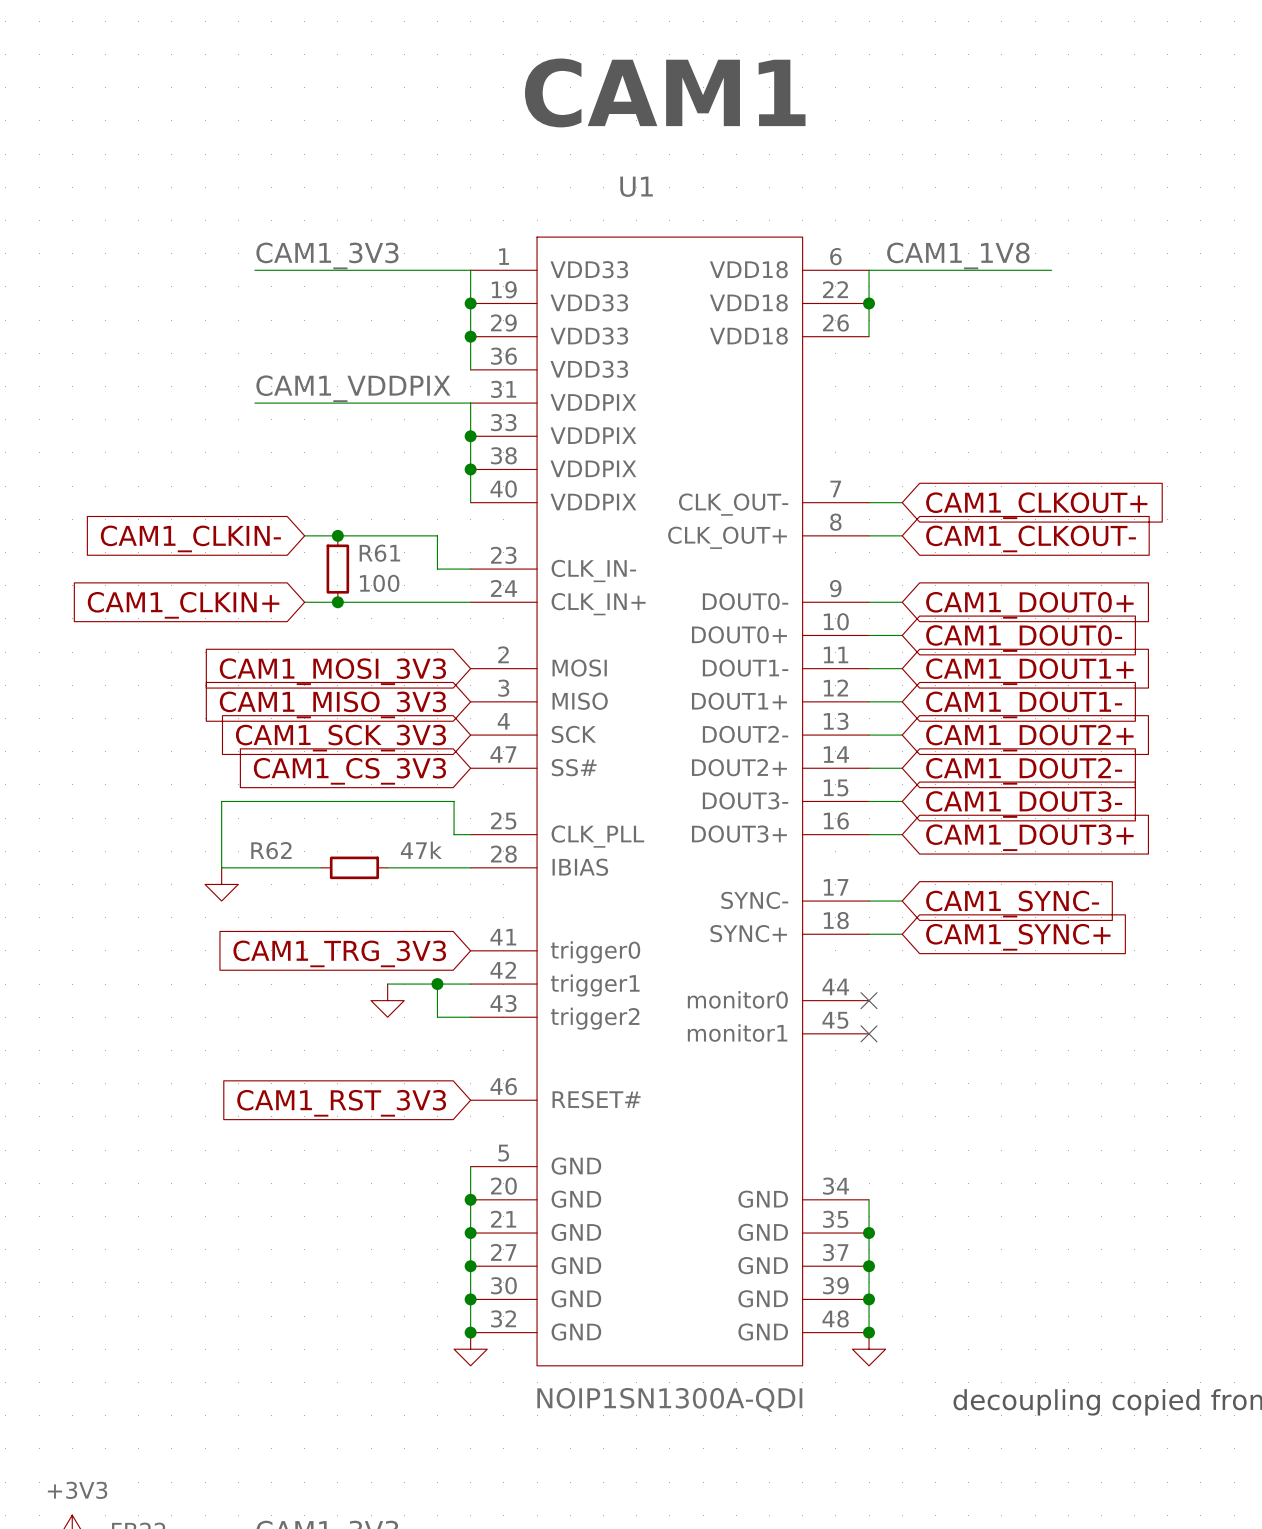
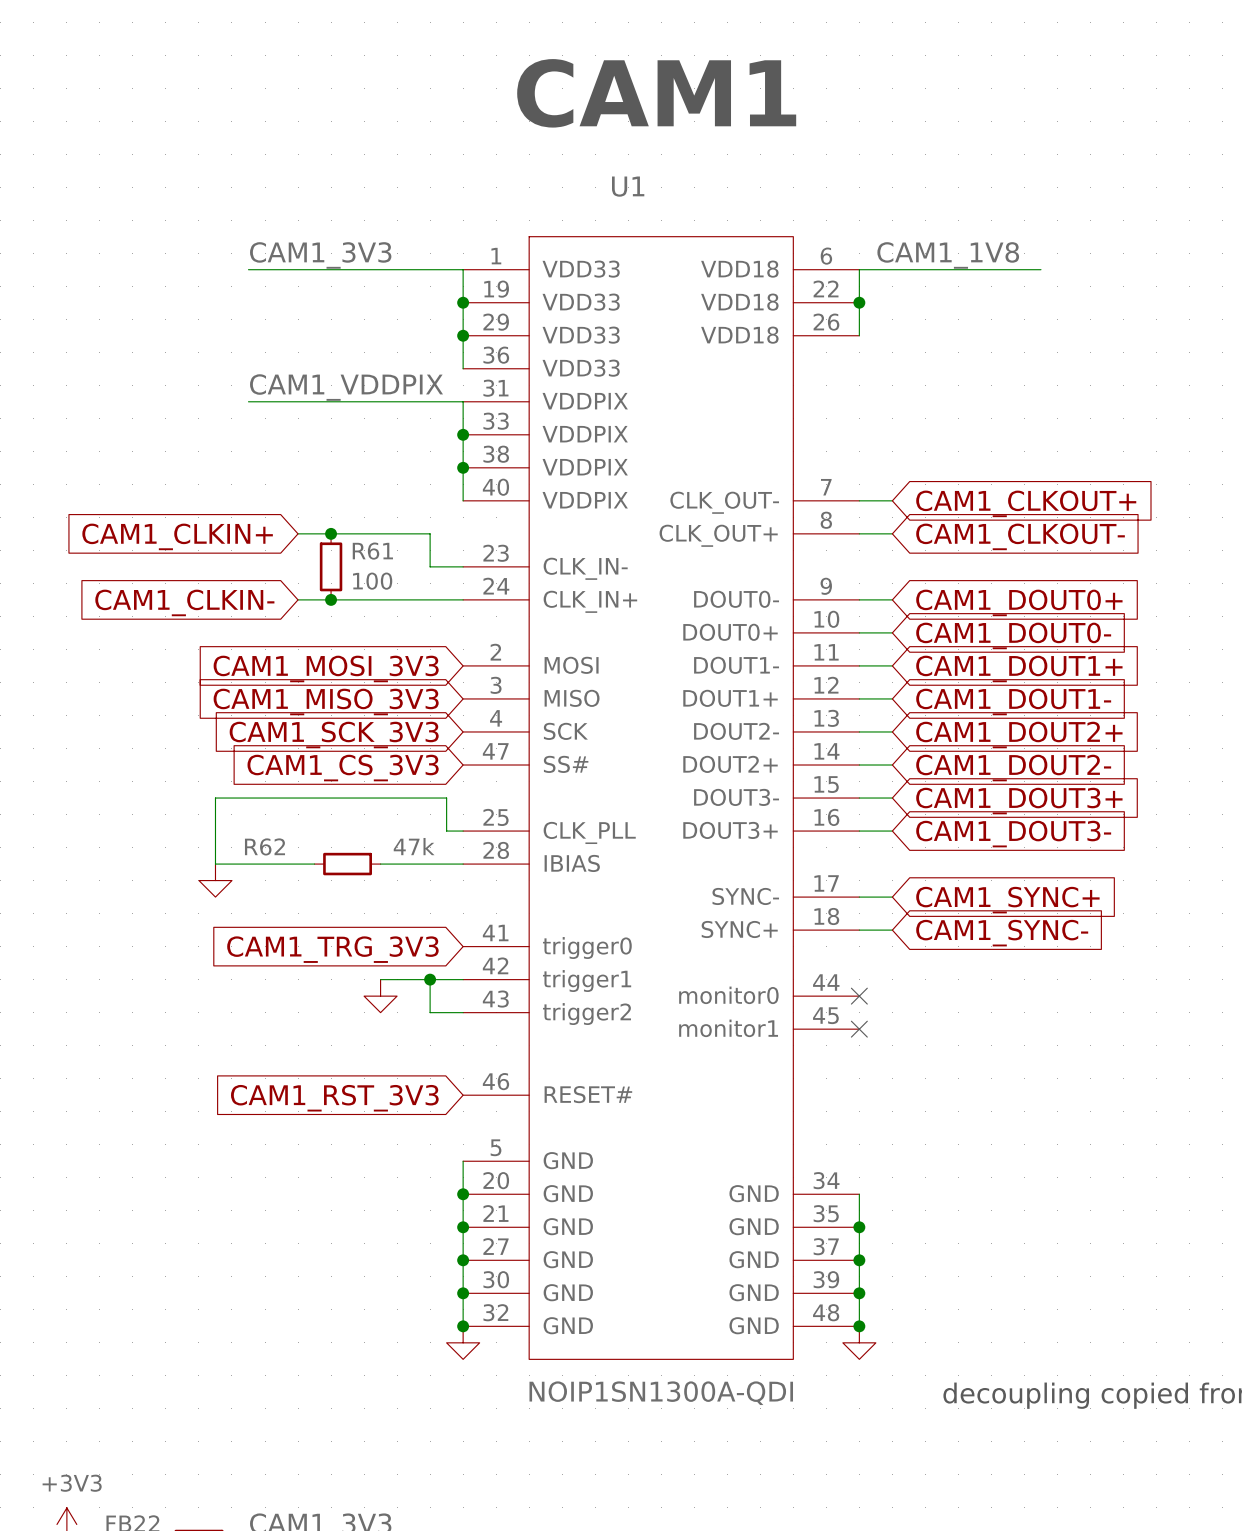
global label: CAM1_CLKIN- (190, 538) -> CAM1_CLKIN+ (177, 536)
global label: CAM1_CLKIN+ (183, 605) -> CAM1_CLKIN- (184, 602)
global label: CAM1_DOUT3- (1024, 804) -> CAM1_DOUT3+ (1019, 801)
global label: CAM1_DOUT3+ (1029, 837) -> CAM1_DOUT3- (1013, 834)
global label: CAM1_SYNC- (1012, 904) -> CAM1_SYNC+ (1007, 900)
global label: CAM1_SYNC+ (1018, 937) -> CAM1_SYNC- (1002, 933)

